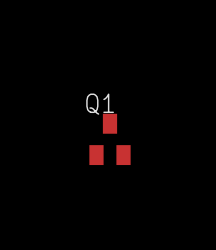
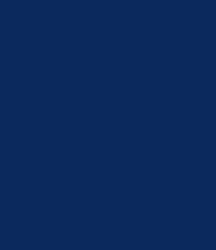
Q1: (109, 139) -> none

